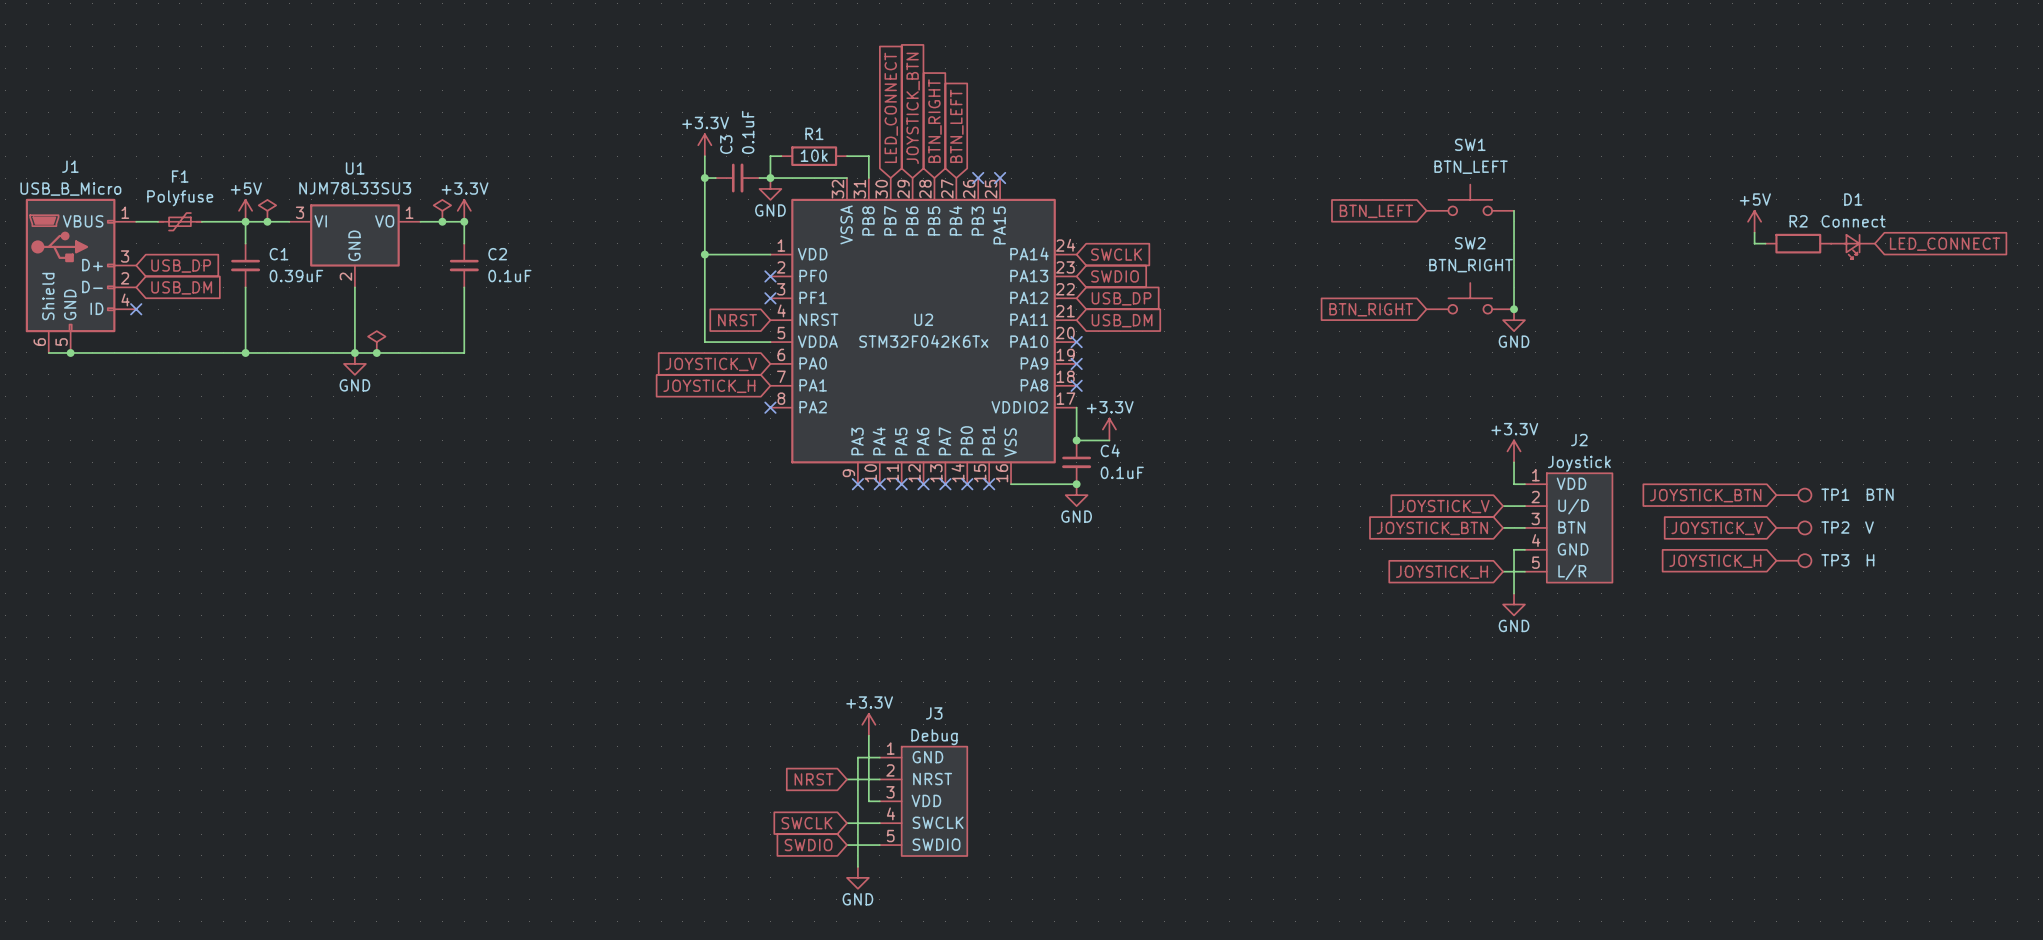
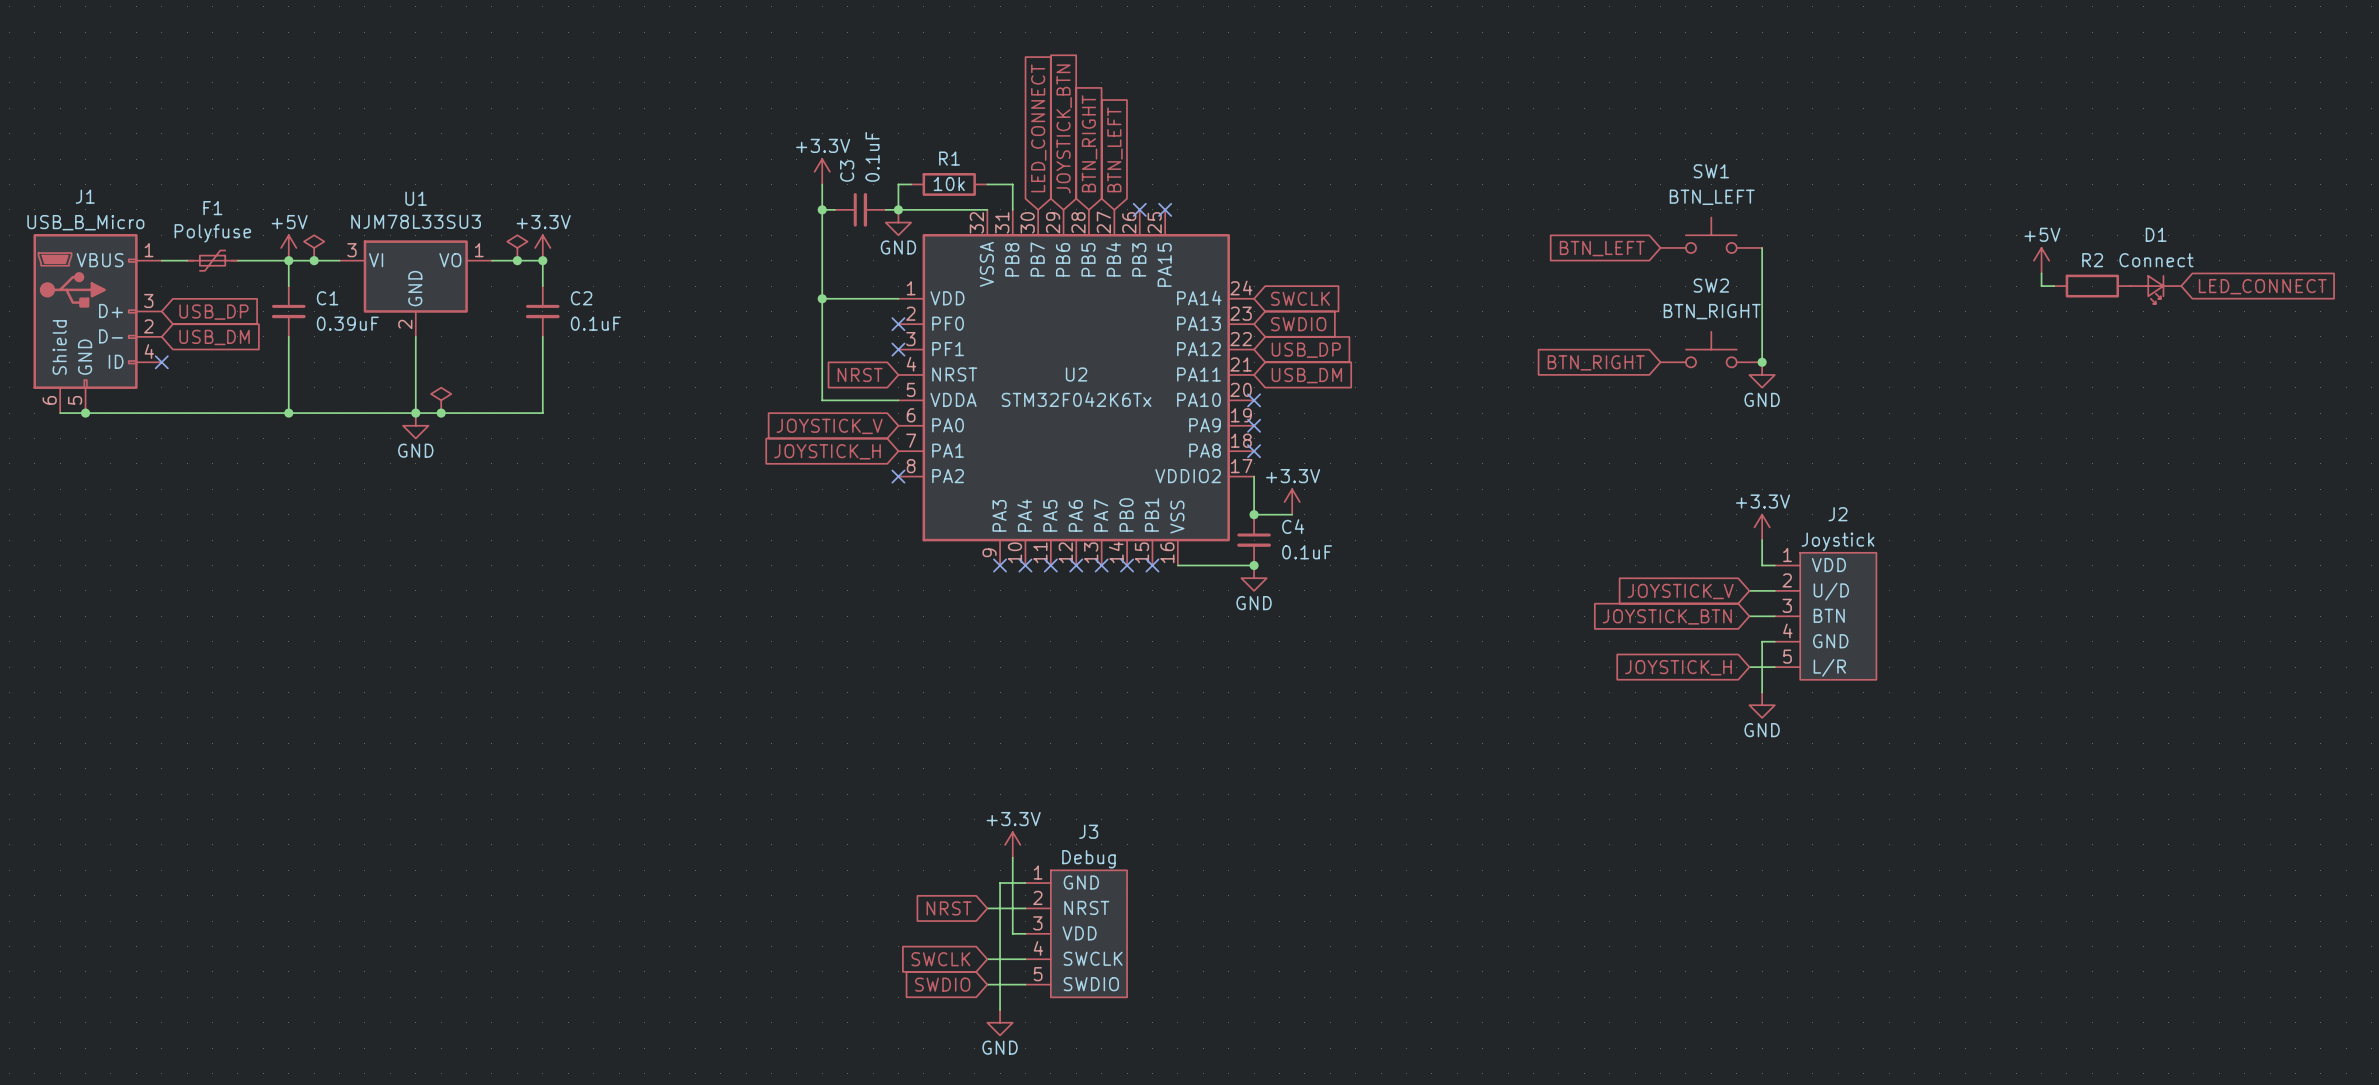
global label: JOYSTICK_BTN (1705, 495) -> none
TP1: BTN (1793, 495) -> none
TP2: V (1793, 527) -> none
global label: JOYSTICK_V (1717, 528) -> none
TP3: H (1793, 560) -> none
global label: JOYSTICK_H (1715, 561) -> none

